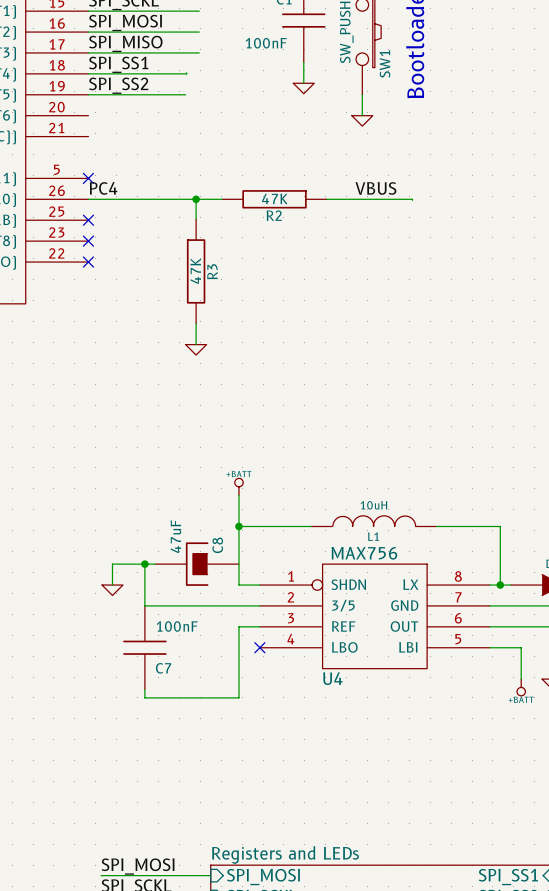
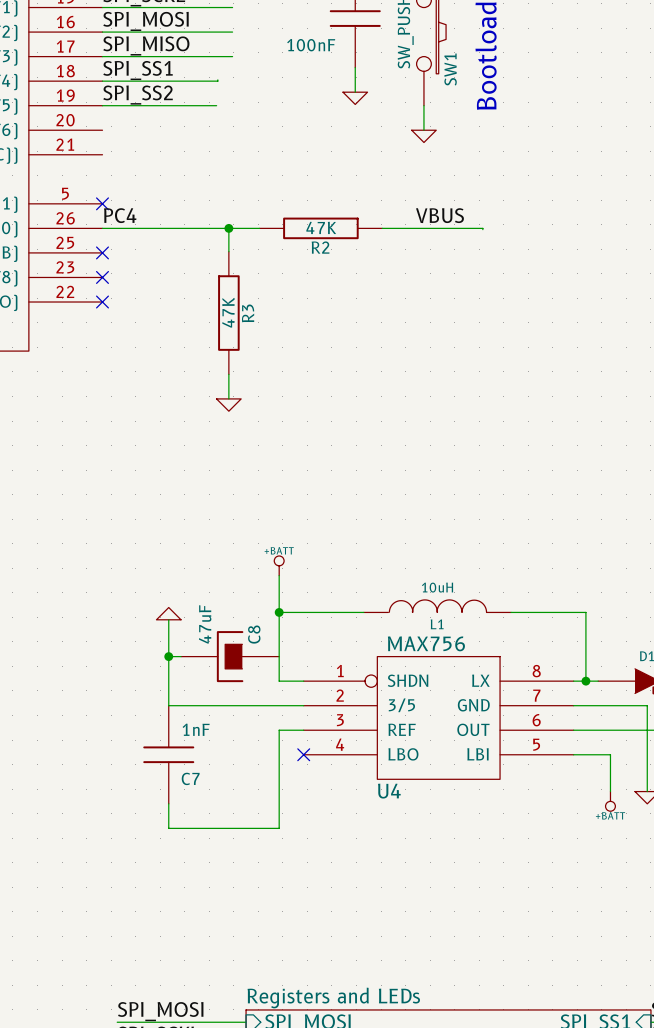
wire: (144, 564) (112, 564) (112, 585) -> (168, 656) (168, 619)
power symbol rotation: 0° (112, 590) -> 180° (168, 613)
power symbol position: (112, 590) -> (168, 613)
C7 value: 100nF (177, 626) -> 1nF (196, 729)
wire: (144, 697) (238, 697) -> (168, 813) (168, 828) (279, 828) (279, 813)

